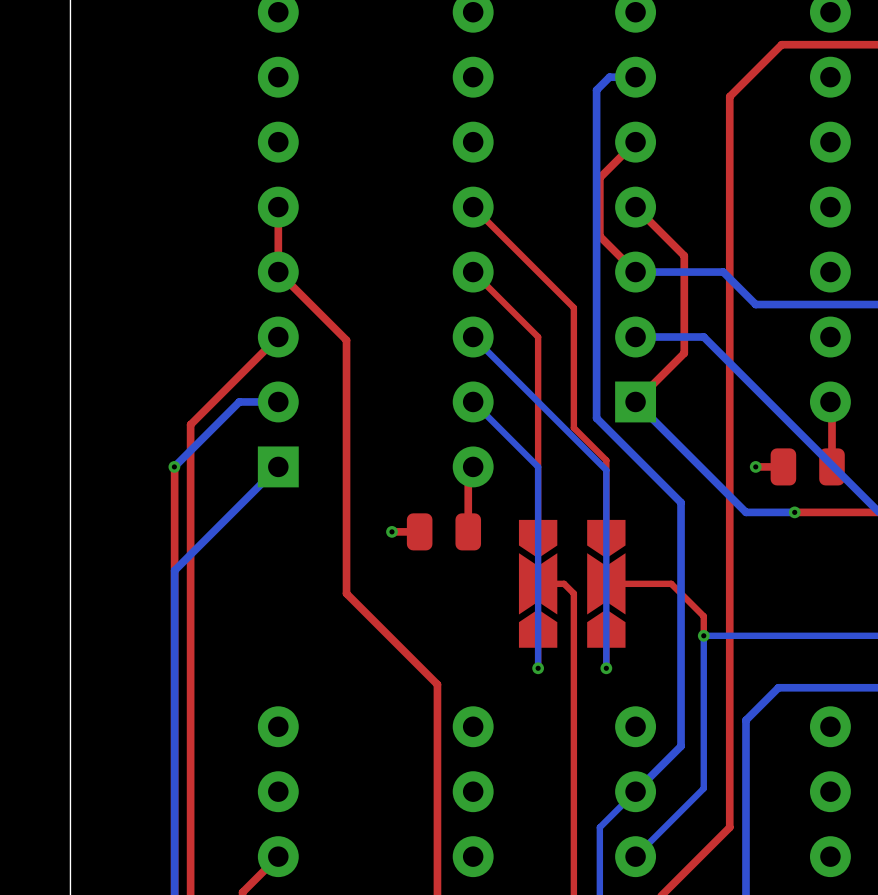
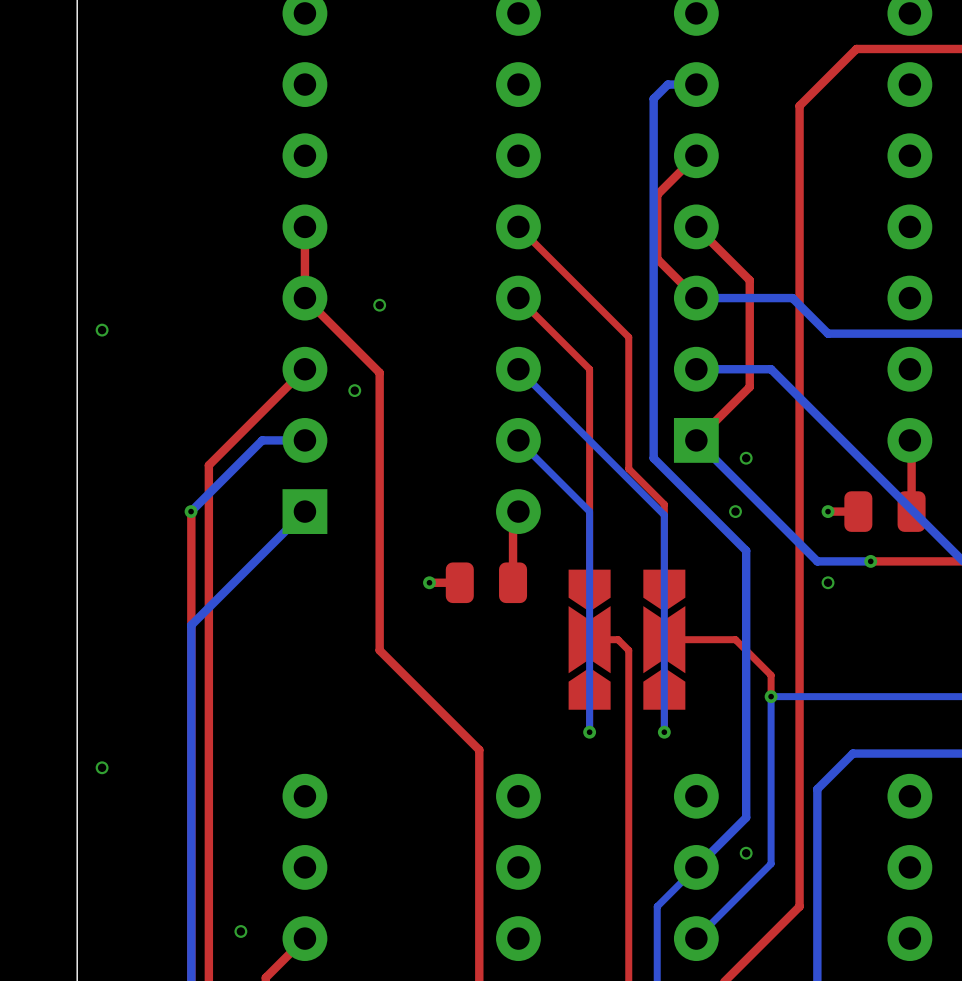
via: none -> (379, 305)
via: none -> (102, 330)
via: none -> (354, 390)
via: none -> (746, 458)
via: none -> (735, 511)
via: none -> (828, 582)
via: none -> (102, 767)
via: none -> (746, 853)
via: none -> (240, 931)

